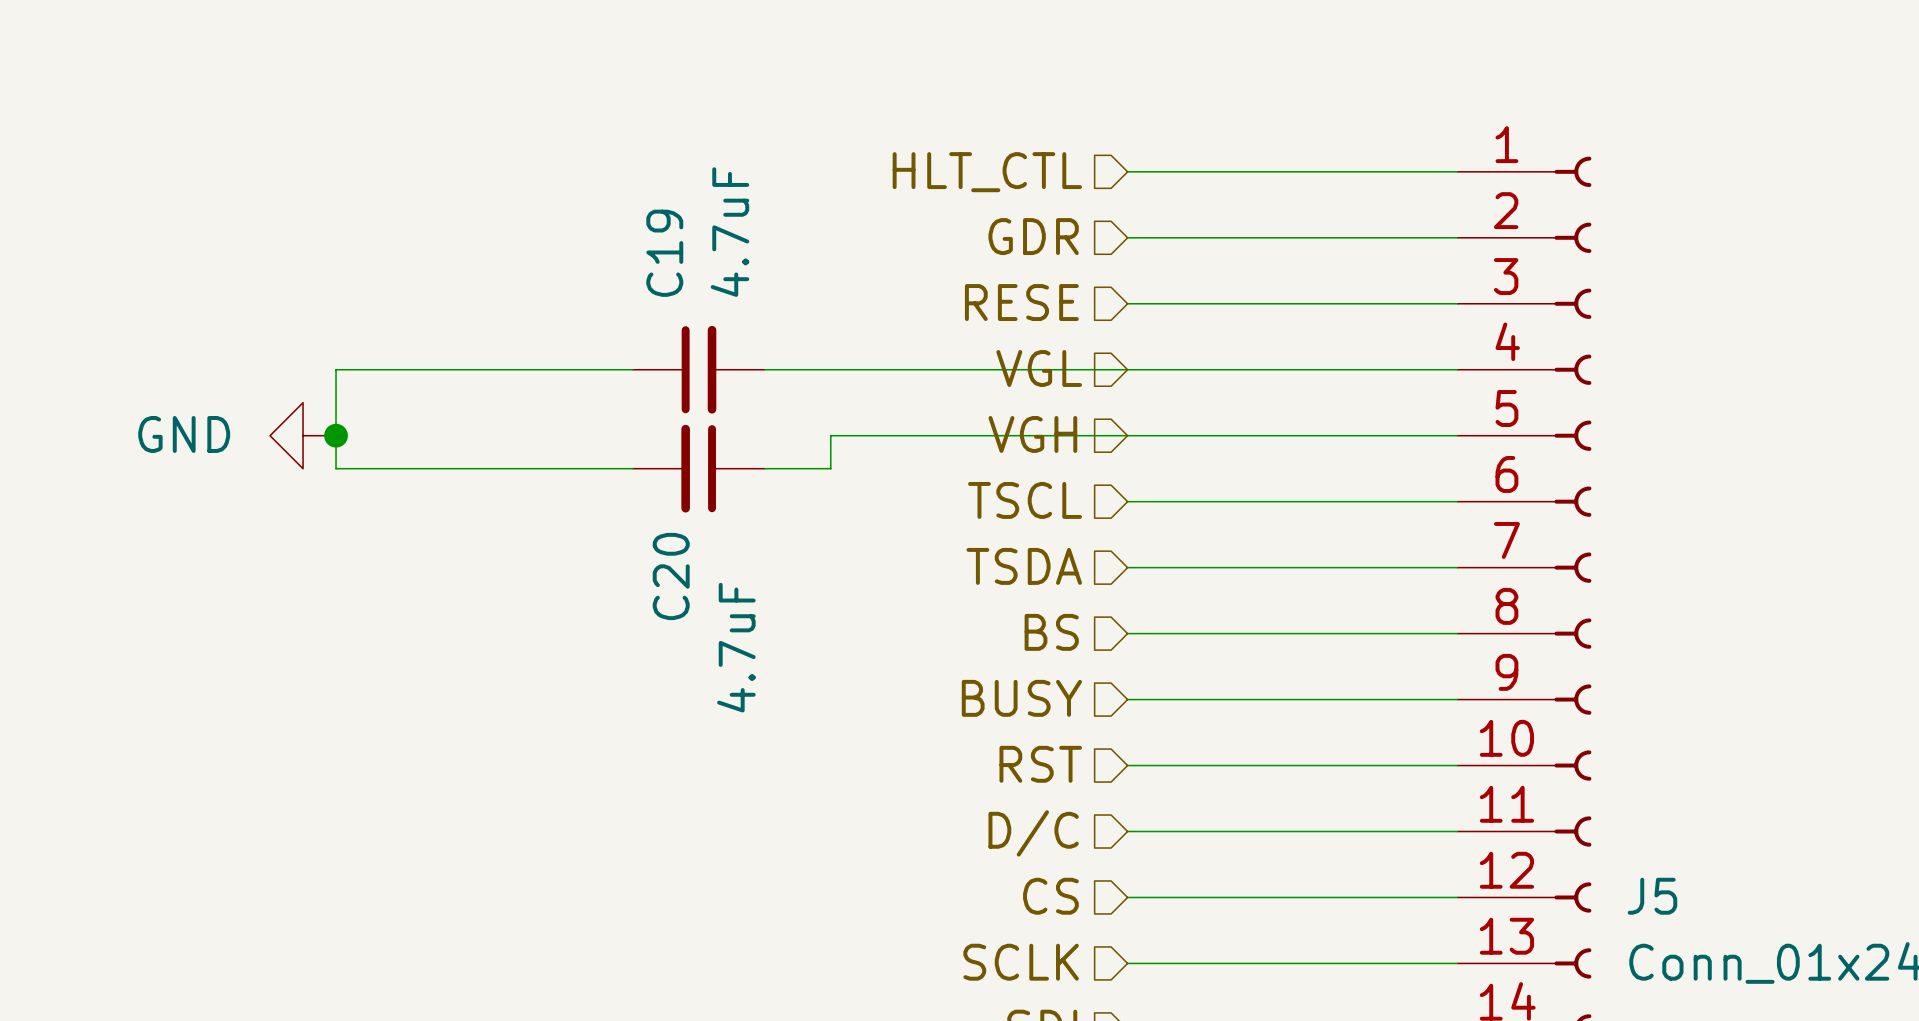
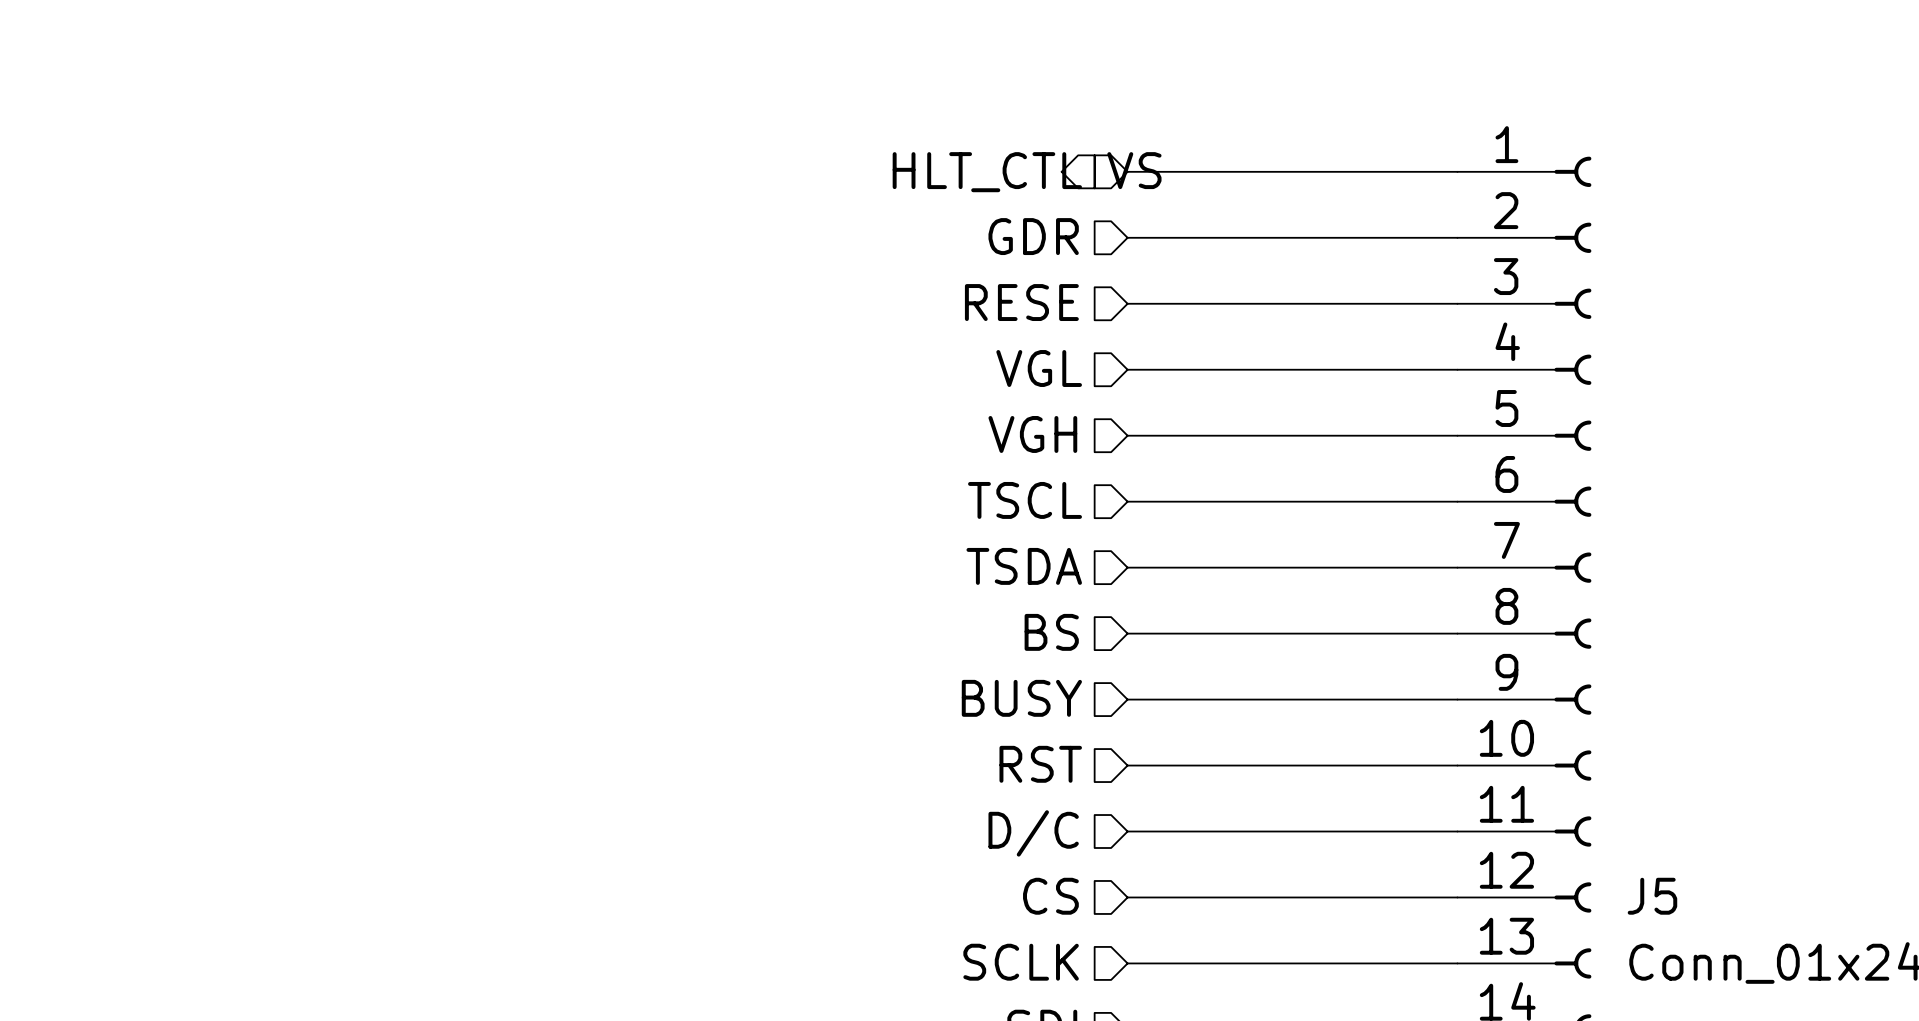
hierarchical label: none -> VS (1134, 170)
wire: (632, 369) (336, 369) (336, 468) (632, 468) -> none
C19: 4.7uF (698, 369) -> none
wire: (764, 369) (1127, 369) -> none
power symbol: GND (303, 435) -> none
junction: (336, 435) -> none
wire: (1127, 435) (830, 435) (830, 468) (764, 468) -> none
C20: 4.7uF (698, 468) -> none

